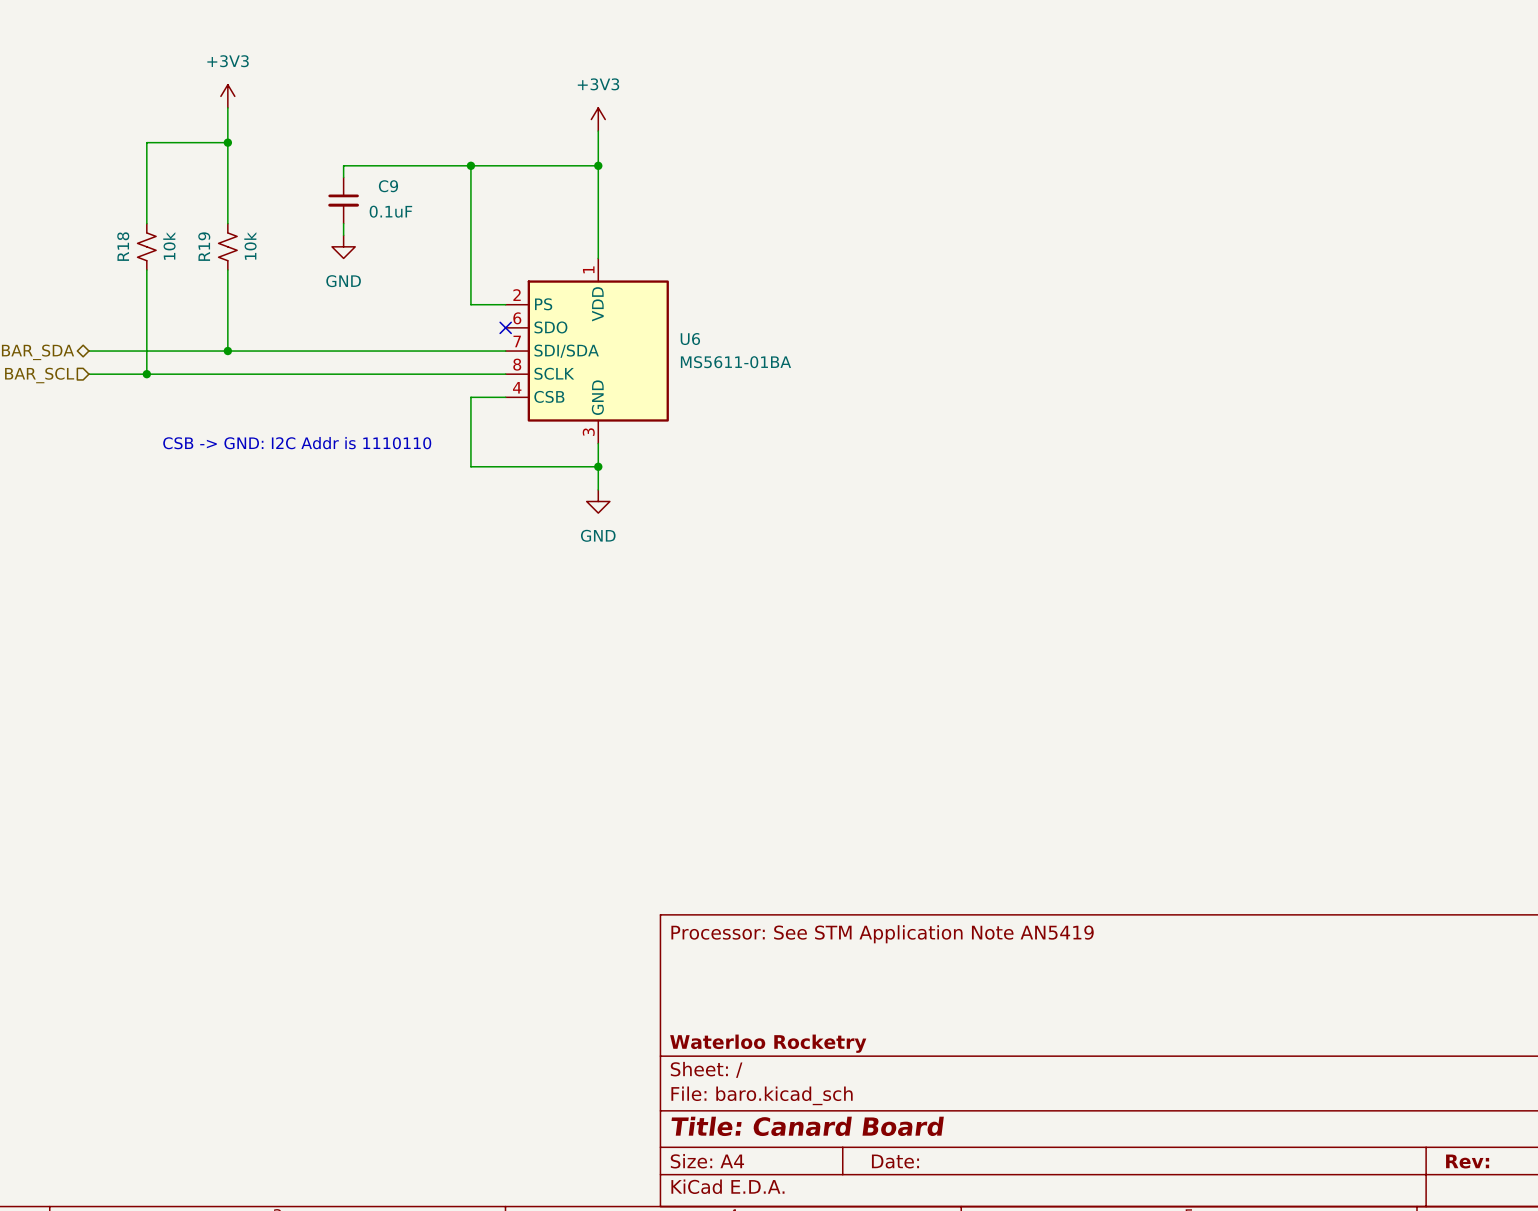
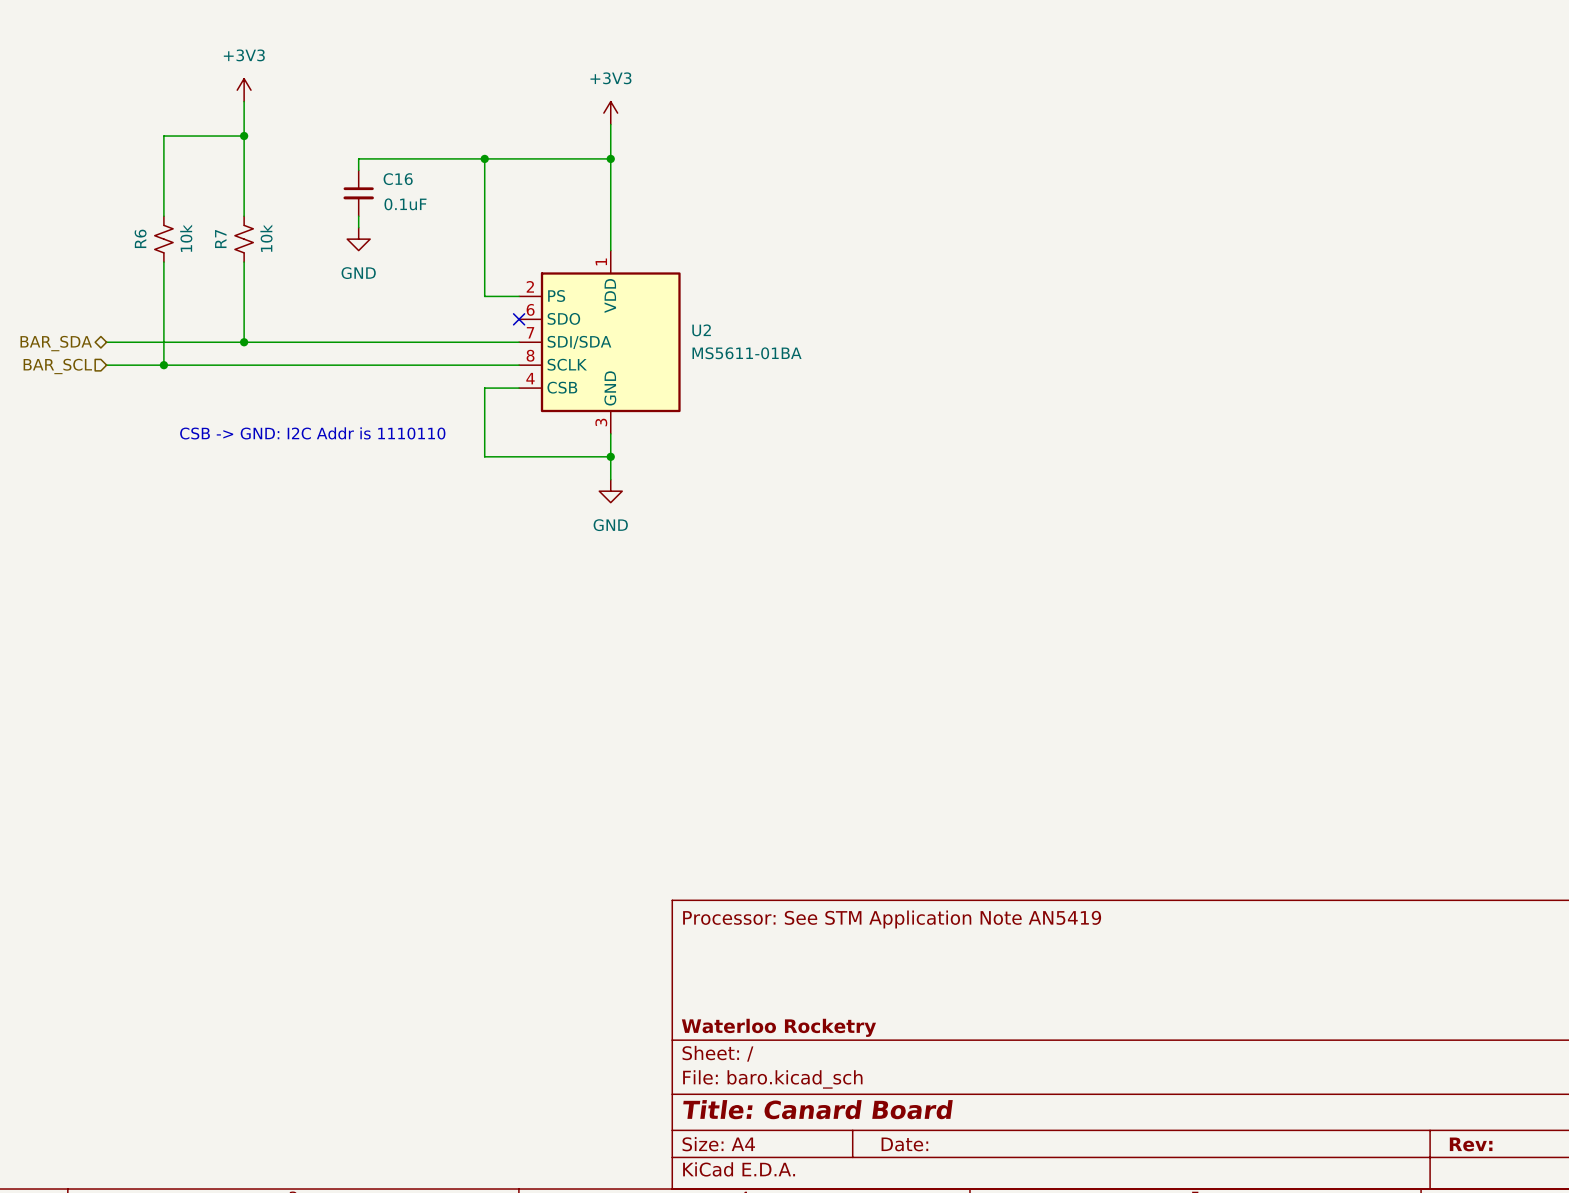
C9 name: C9 (388, 186) -> C16 (398, 179)
R18 name: R18 (123, 246) -> R6 (140, 238)
R19 name: R19 (204, 246) -> R7 (220, 239)
U6 name: U6 (690, 339) -> U2 (701, 330)

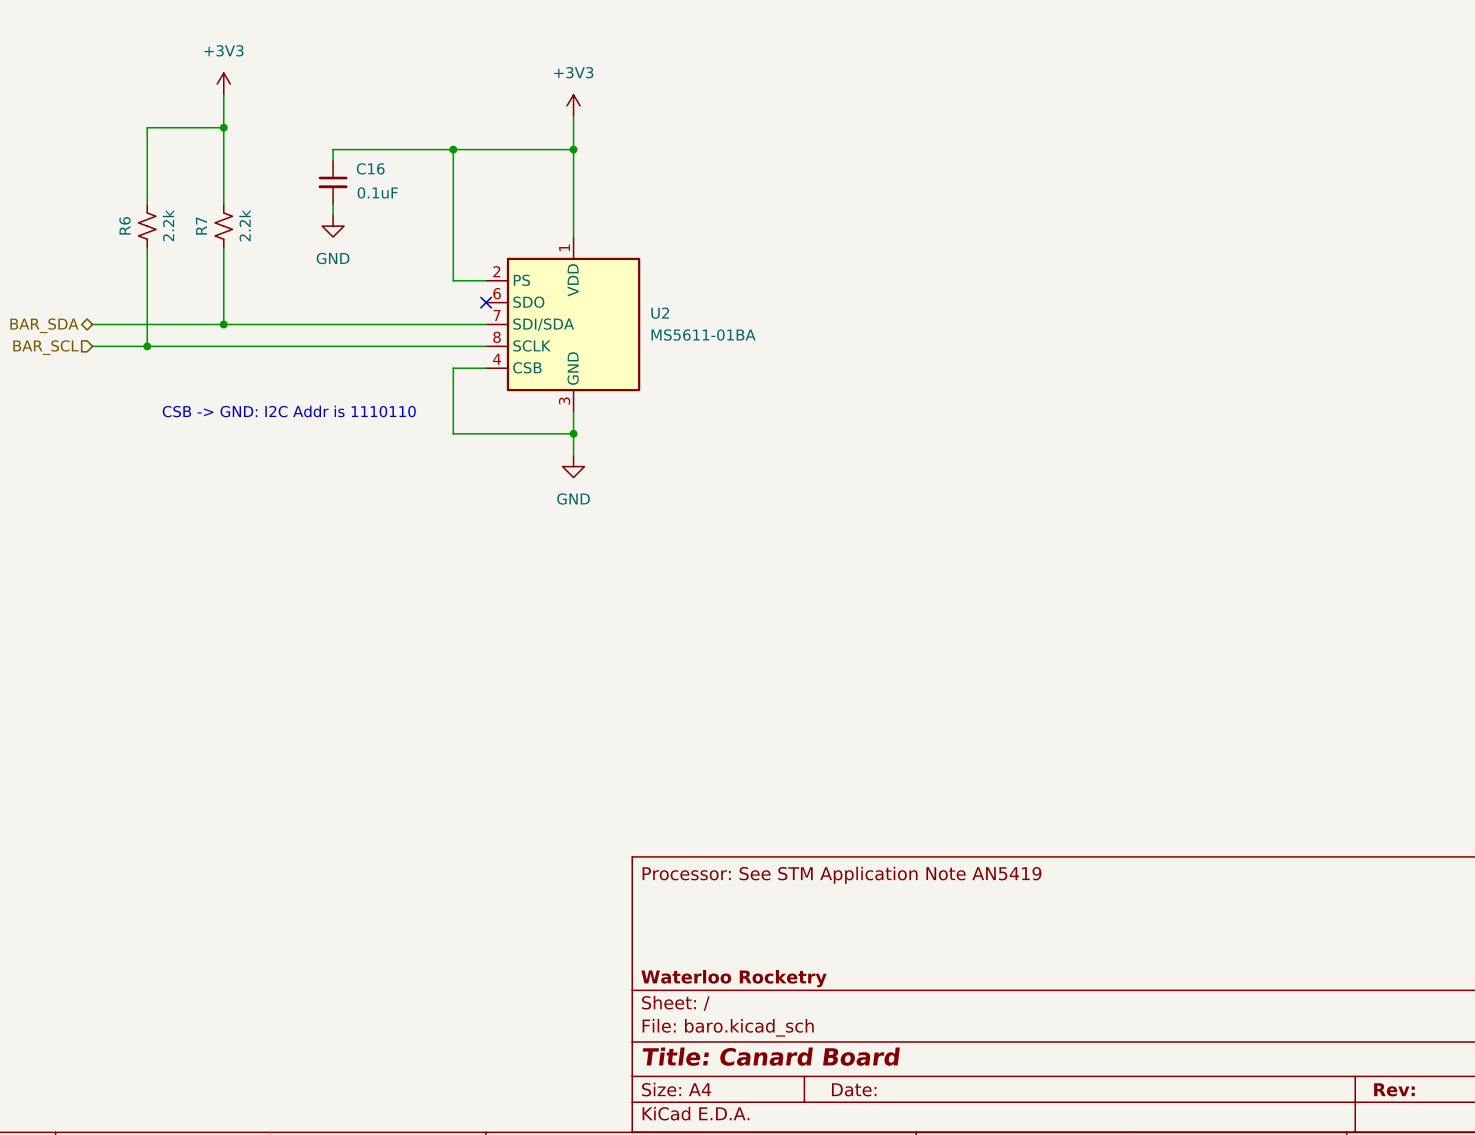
R6 value: 10k (186, 238) -> 2.2k (168, 225)
R7 value: 10k (266, 238) -> 2.2k (244, 225)

